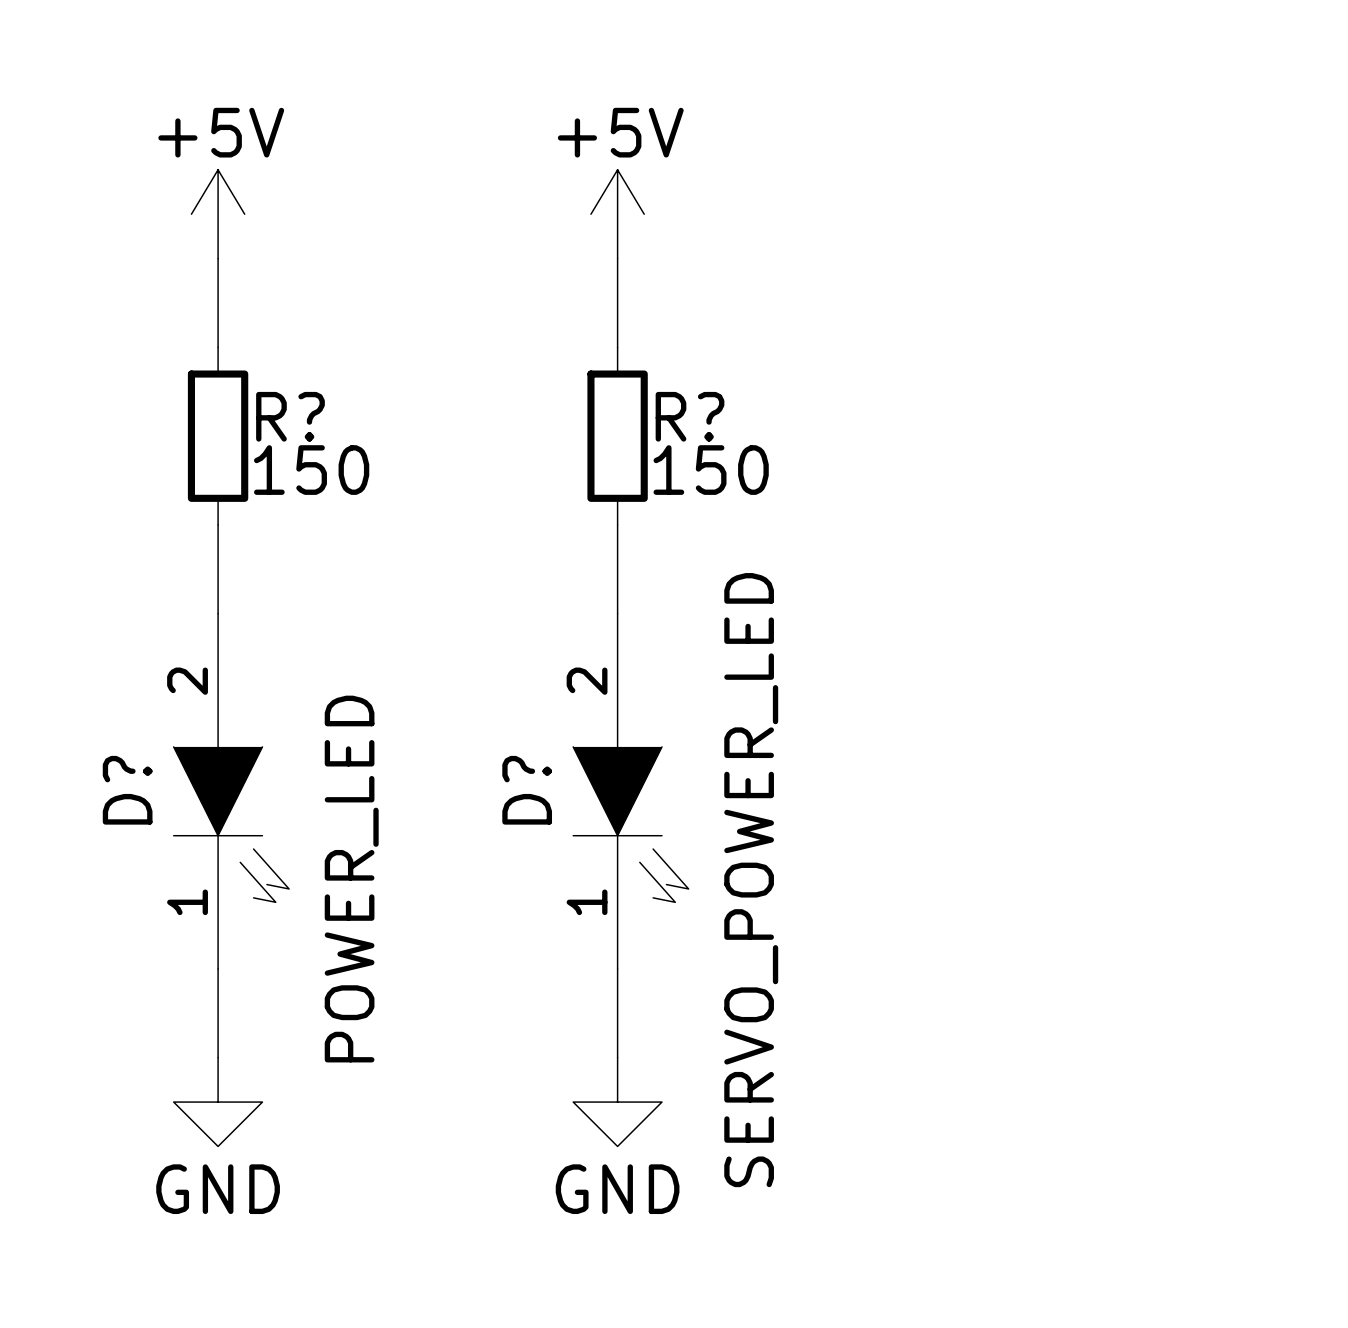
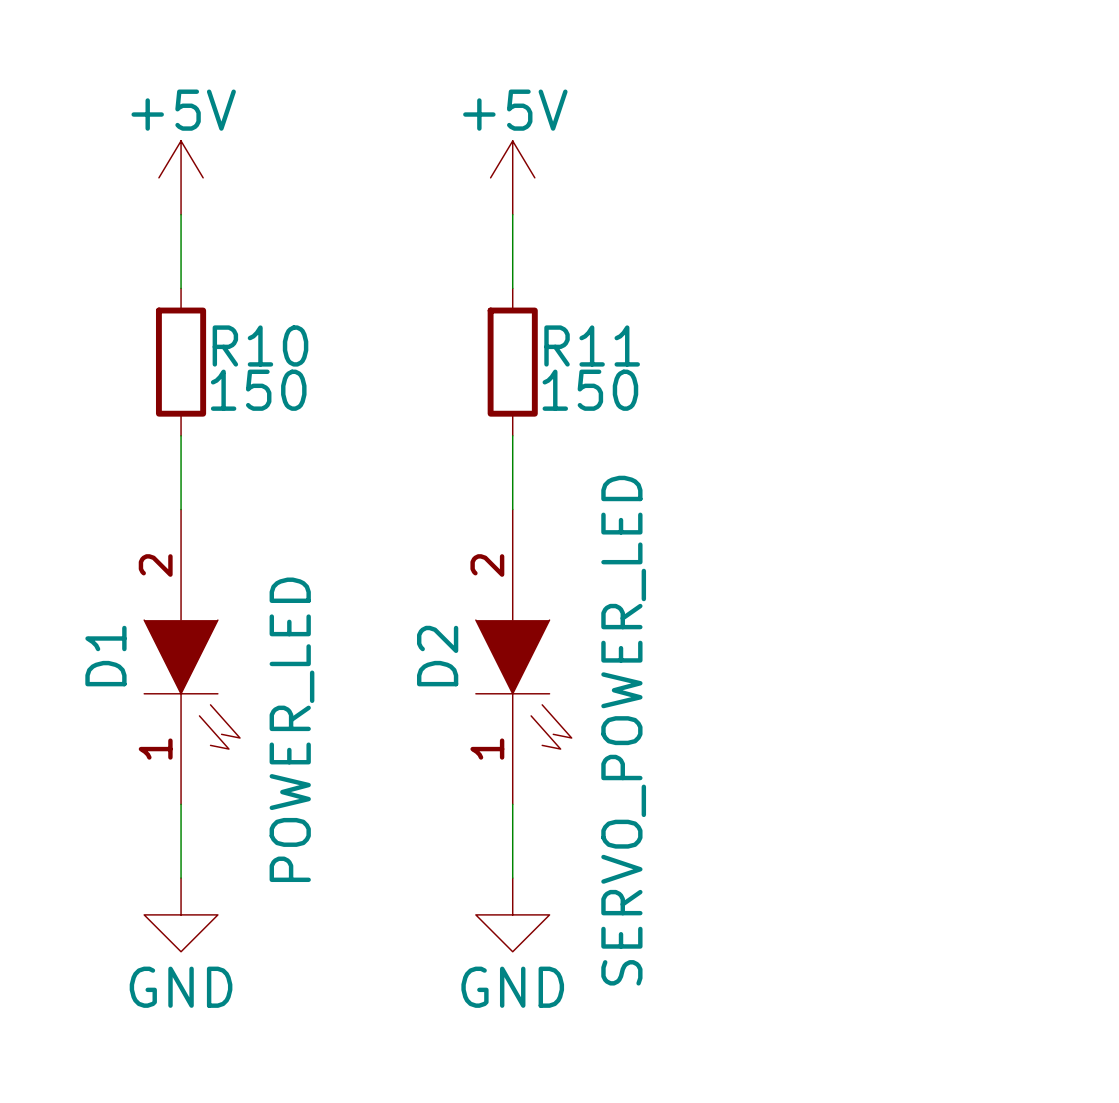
R? name: R? (290, 416) -> R10 (260, 345)
R? name: R? (690, 416) -> R11 (592, 345)
D? name: D? (127, 790) -> D1 (105, 656)
D? name: D? (527, 790) -> D2 (437, 656)

